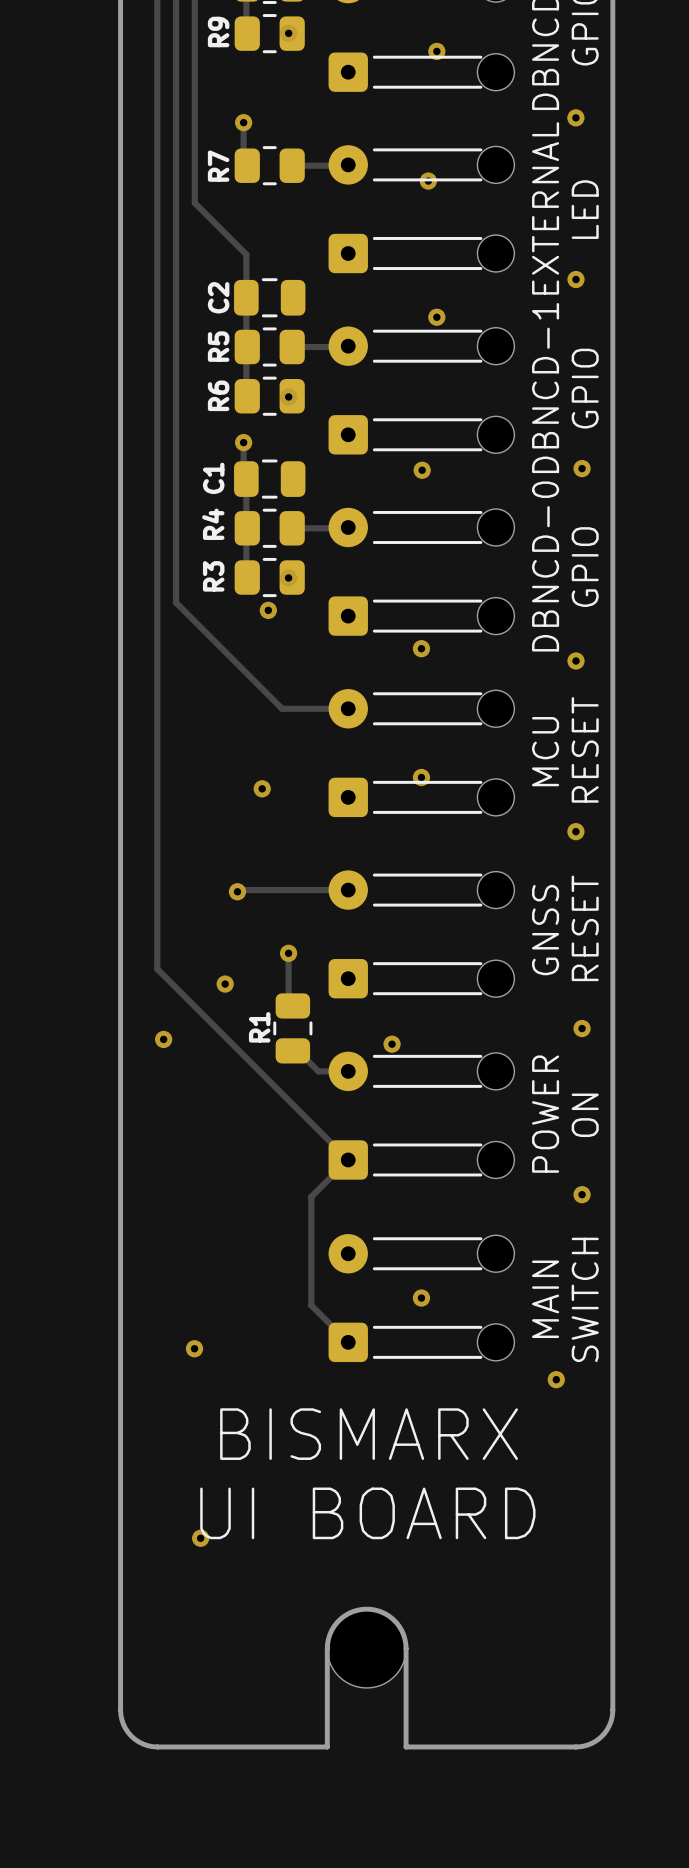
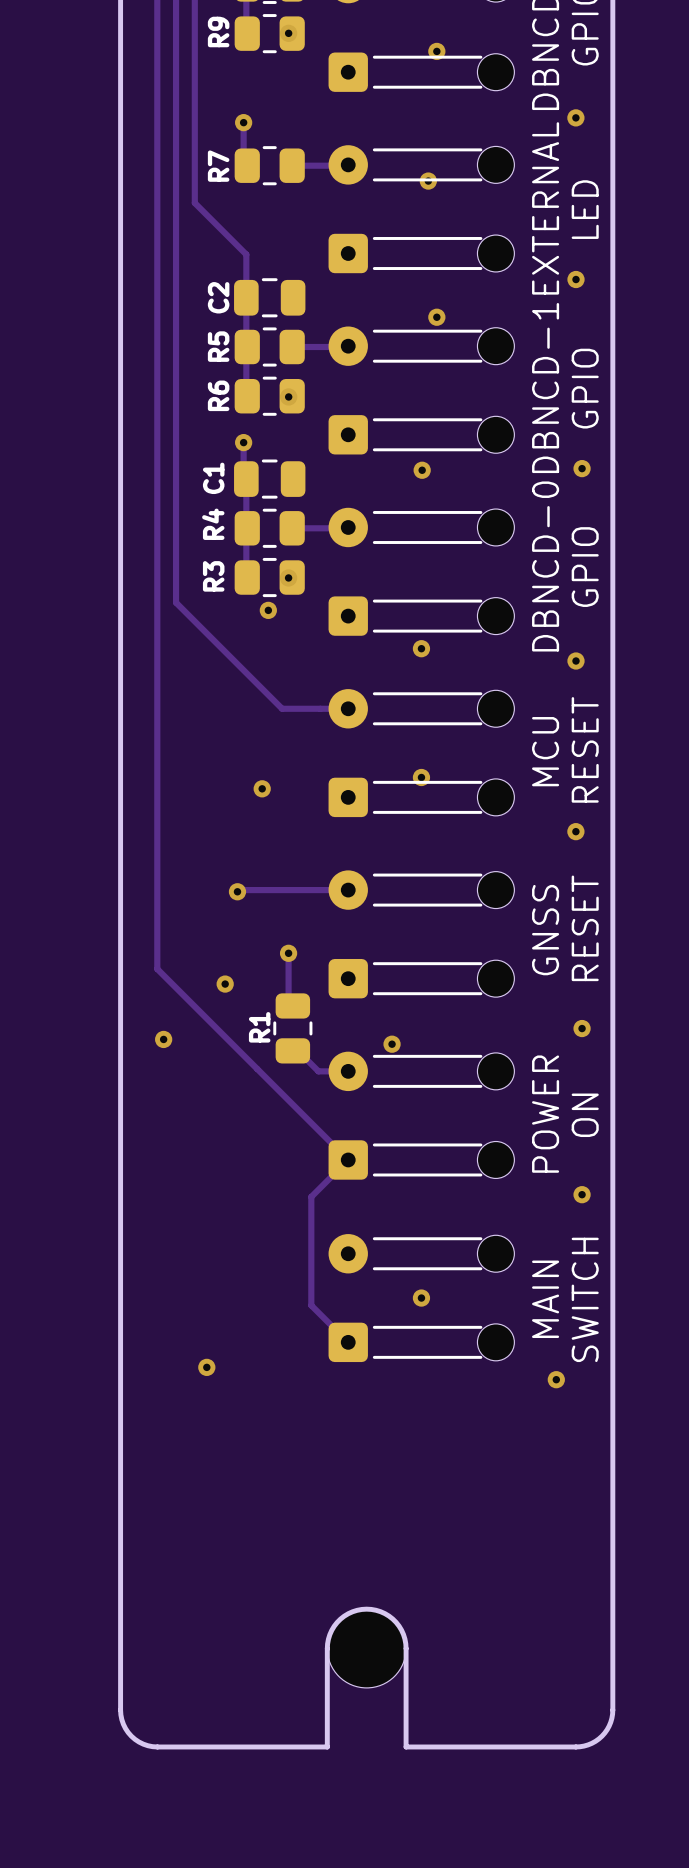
via position: (194, 1348) -> (206, 1367)
text: BISMARX (369, 1434) -> none
text: UI BOARD (367, 1513) -> none
via: (200, 1538) -> none

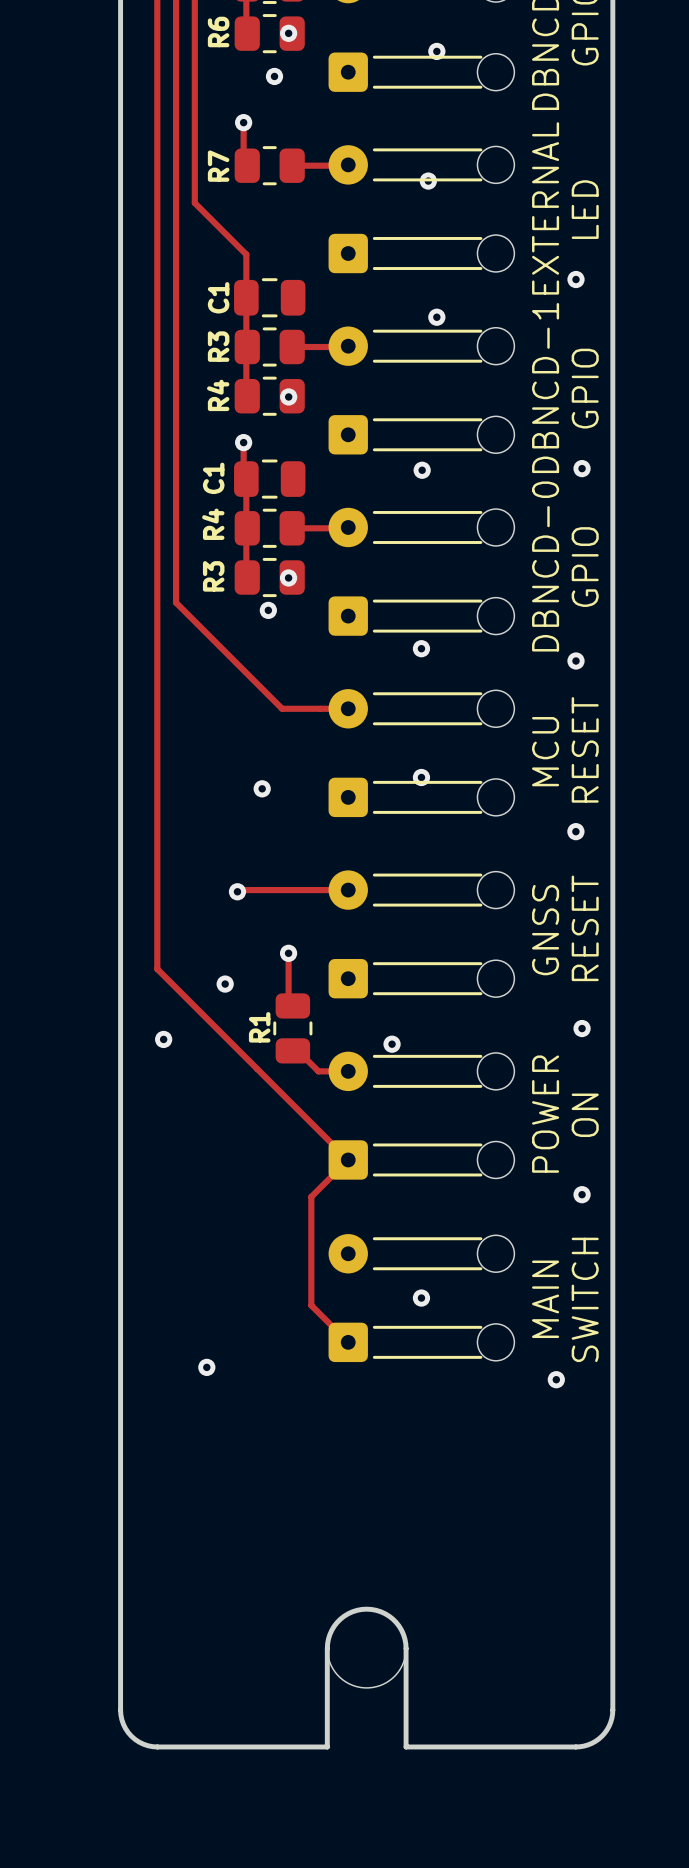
R9 name: R9 (218, 31) -> R6 (218, 31)
via: none -> (274, 76)
via: (575, 117) -> none
C2 name: C2 (218, 297) -> C1 (218, 297)
R5 name: R5 (218, 346) -> R3 (218, 346)
R6 name: R6 (218, 395) -> R4 (218, 395)

